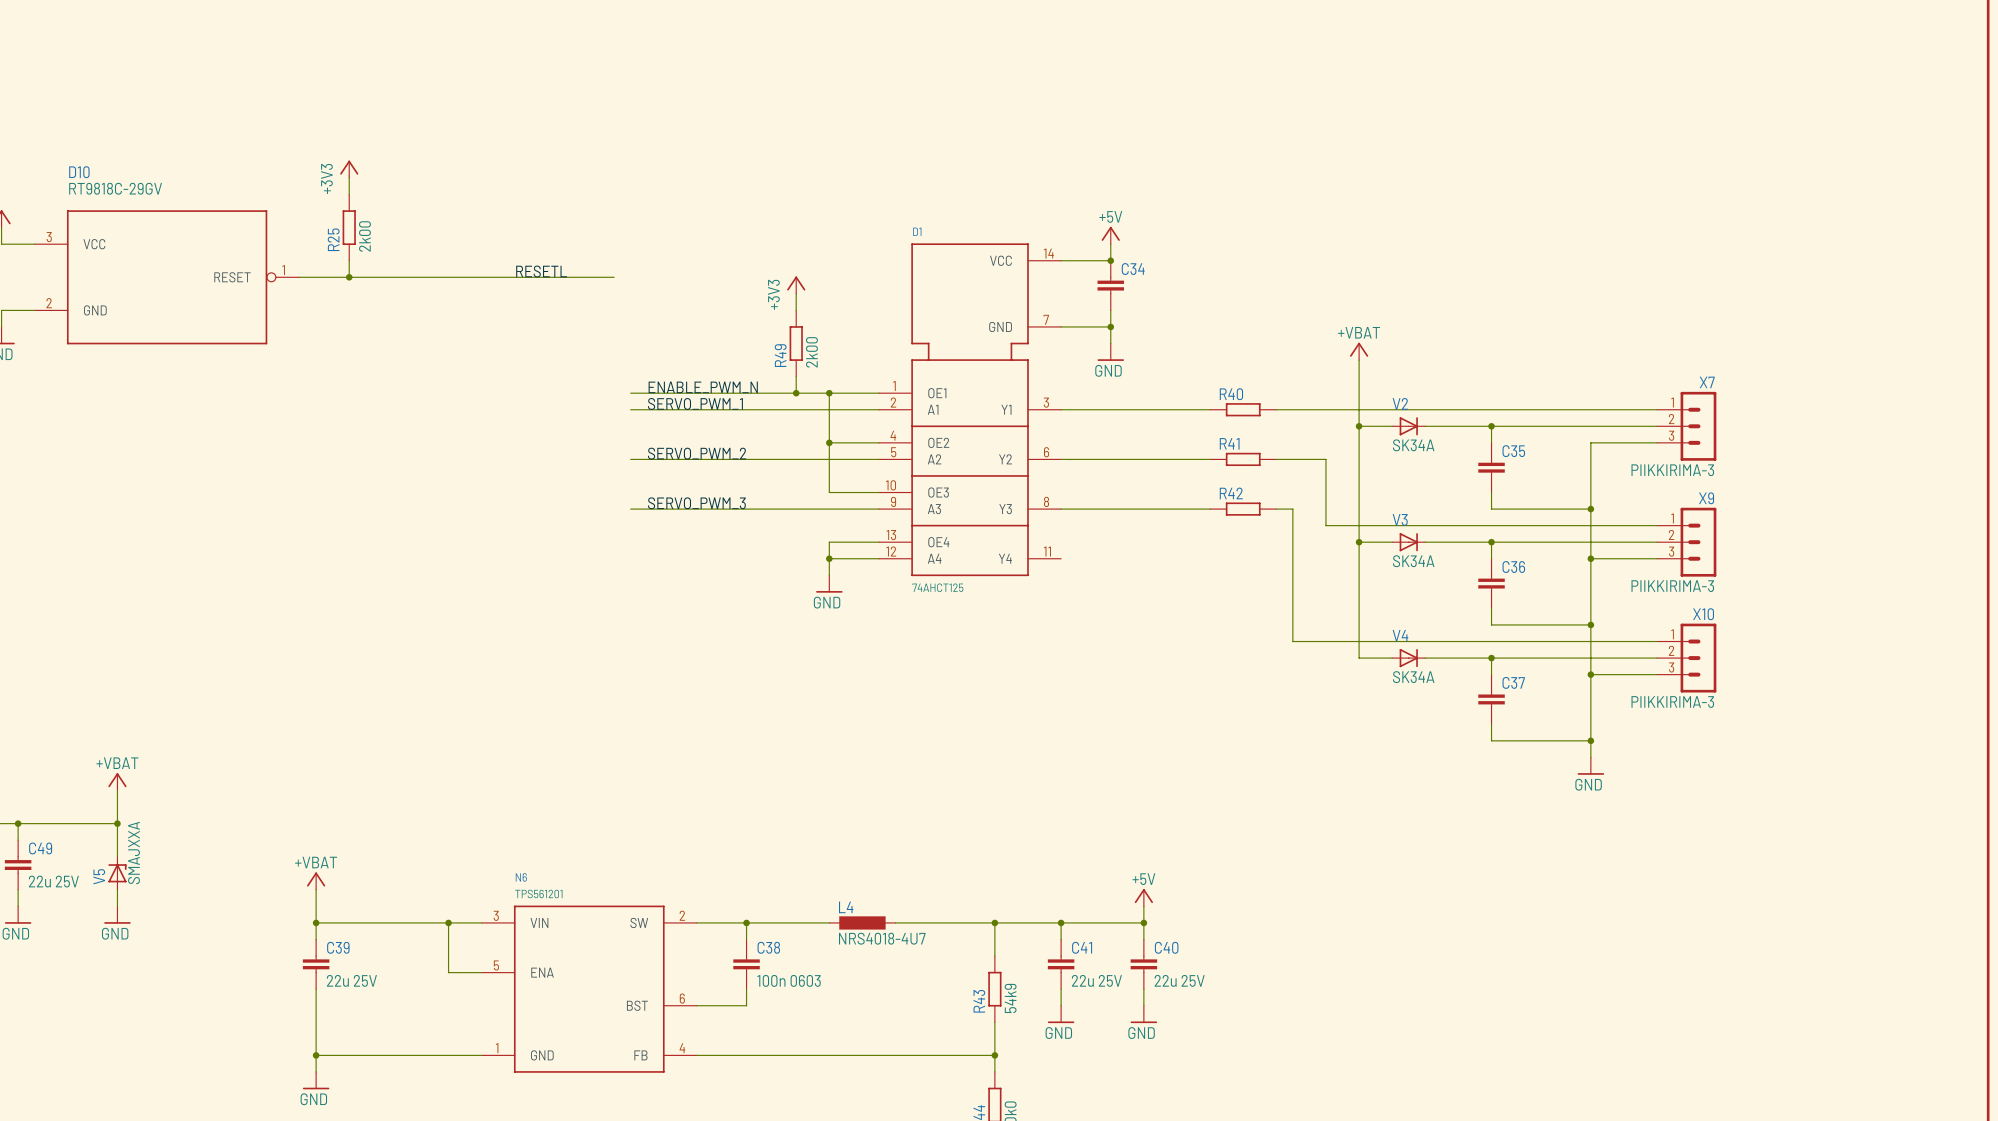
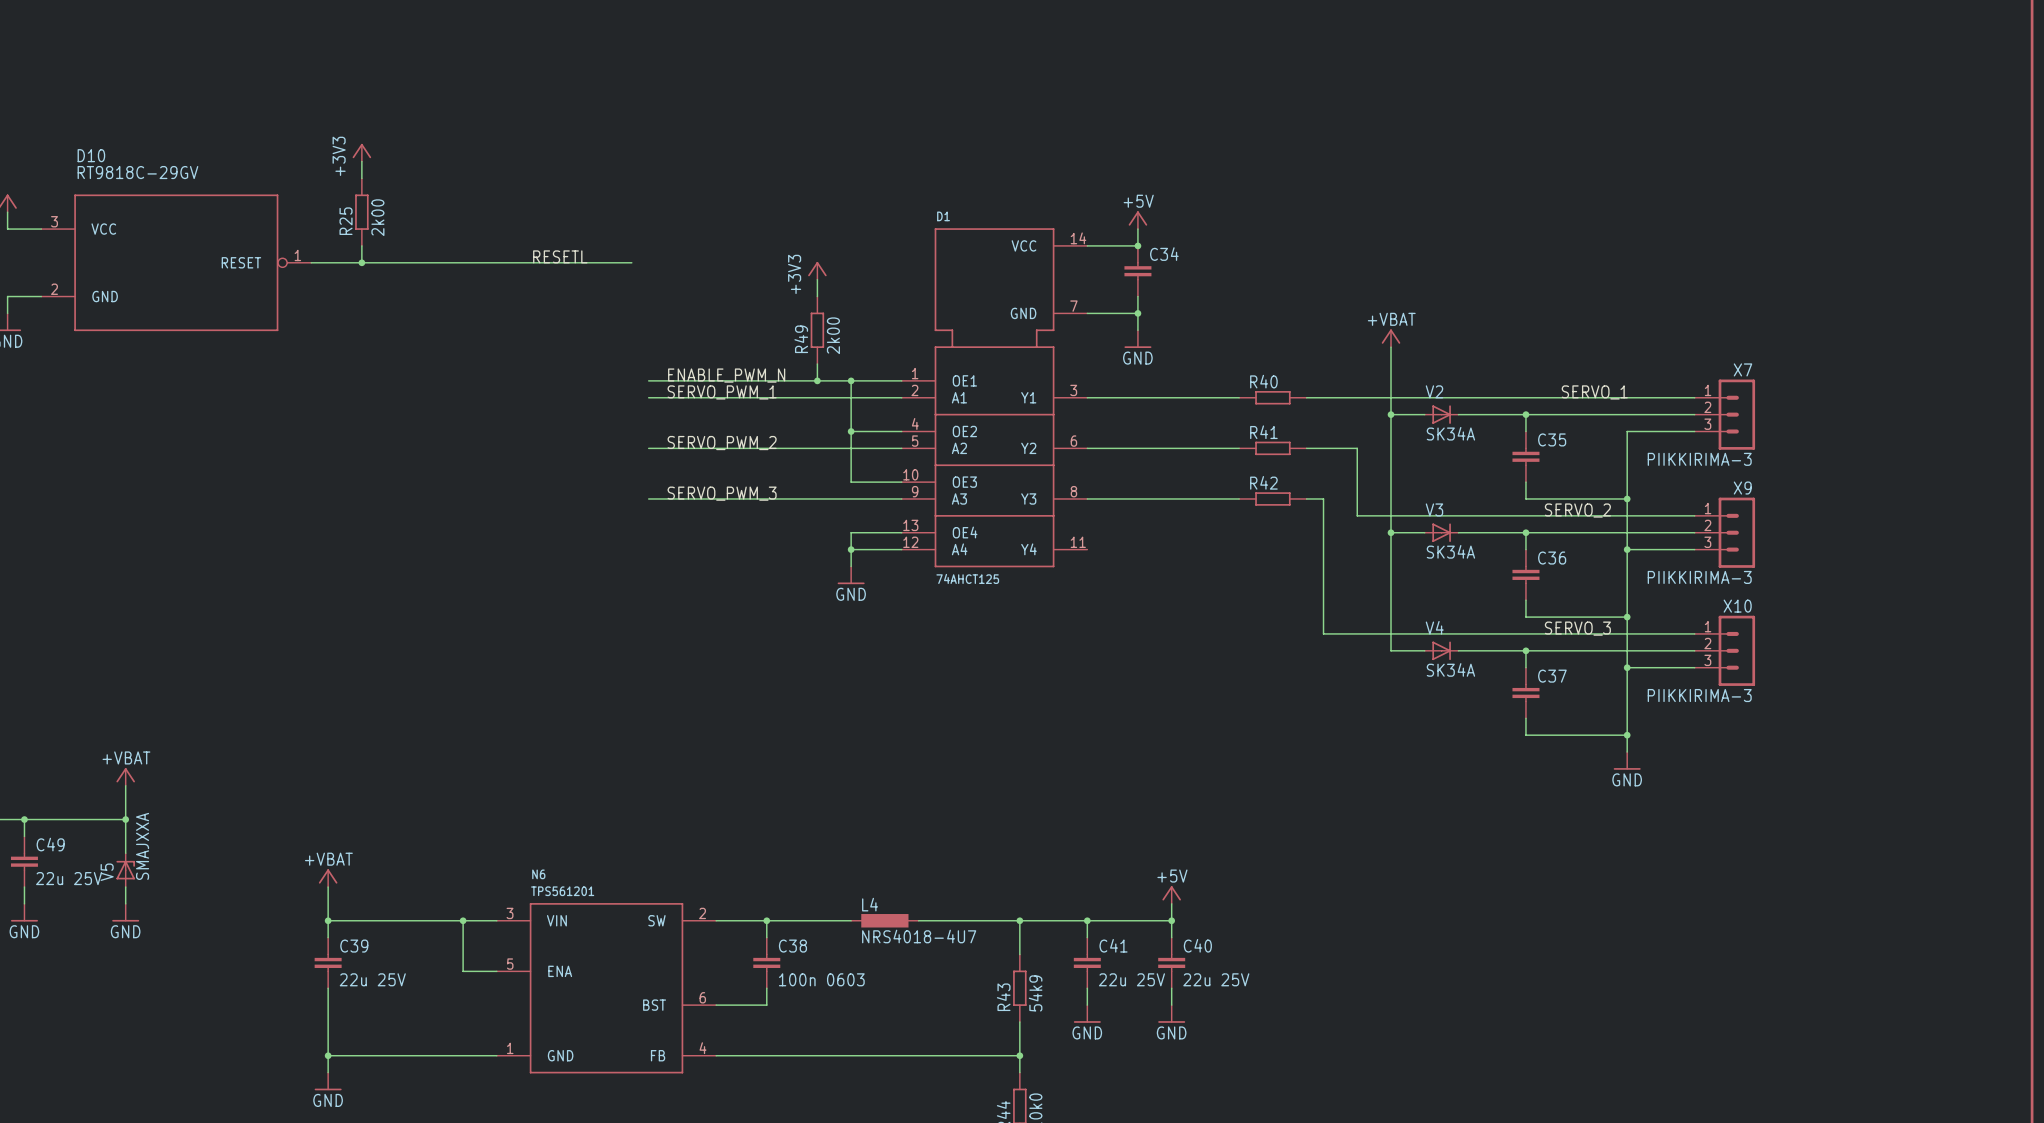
label: none -> SERVO_1 (1594, 392)
label: none -> SERVO_2 (1577, 510)
label: none -> SERVO_3 (1577, 628)

